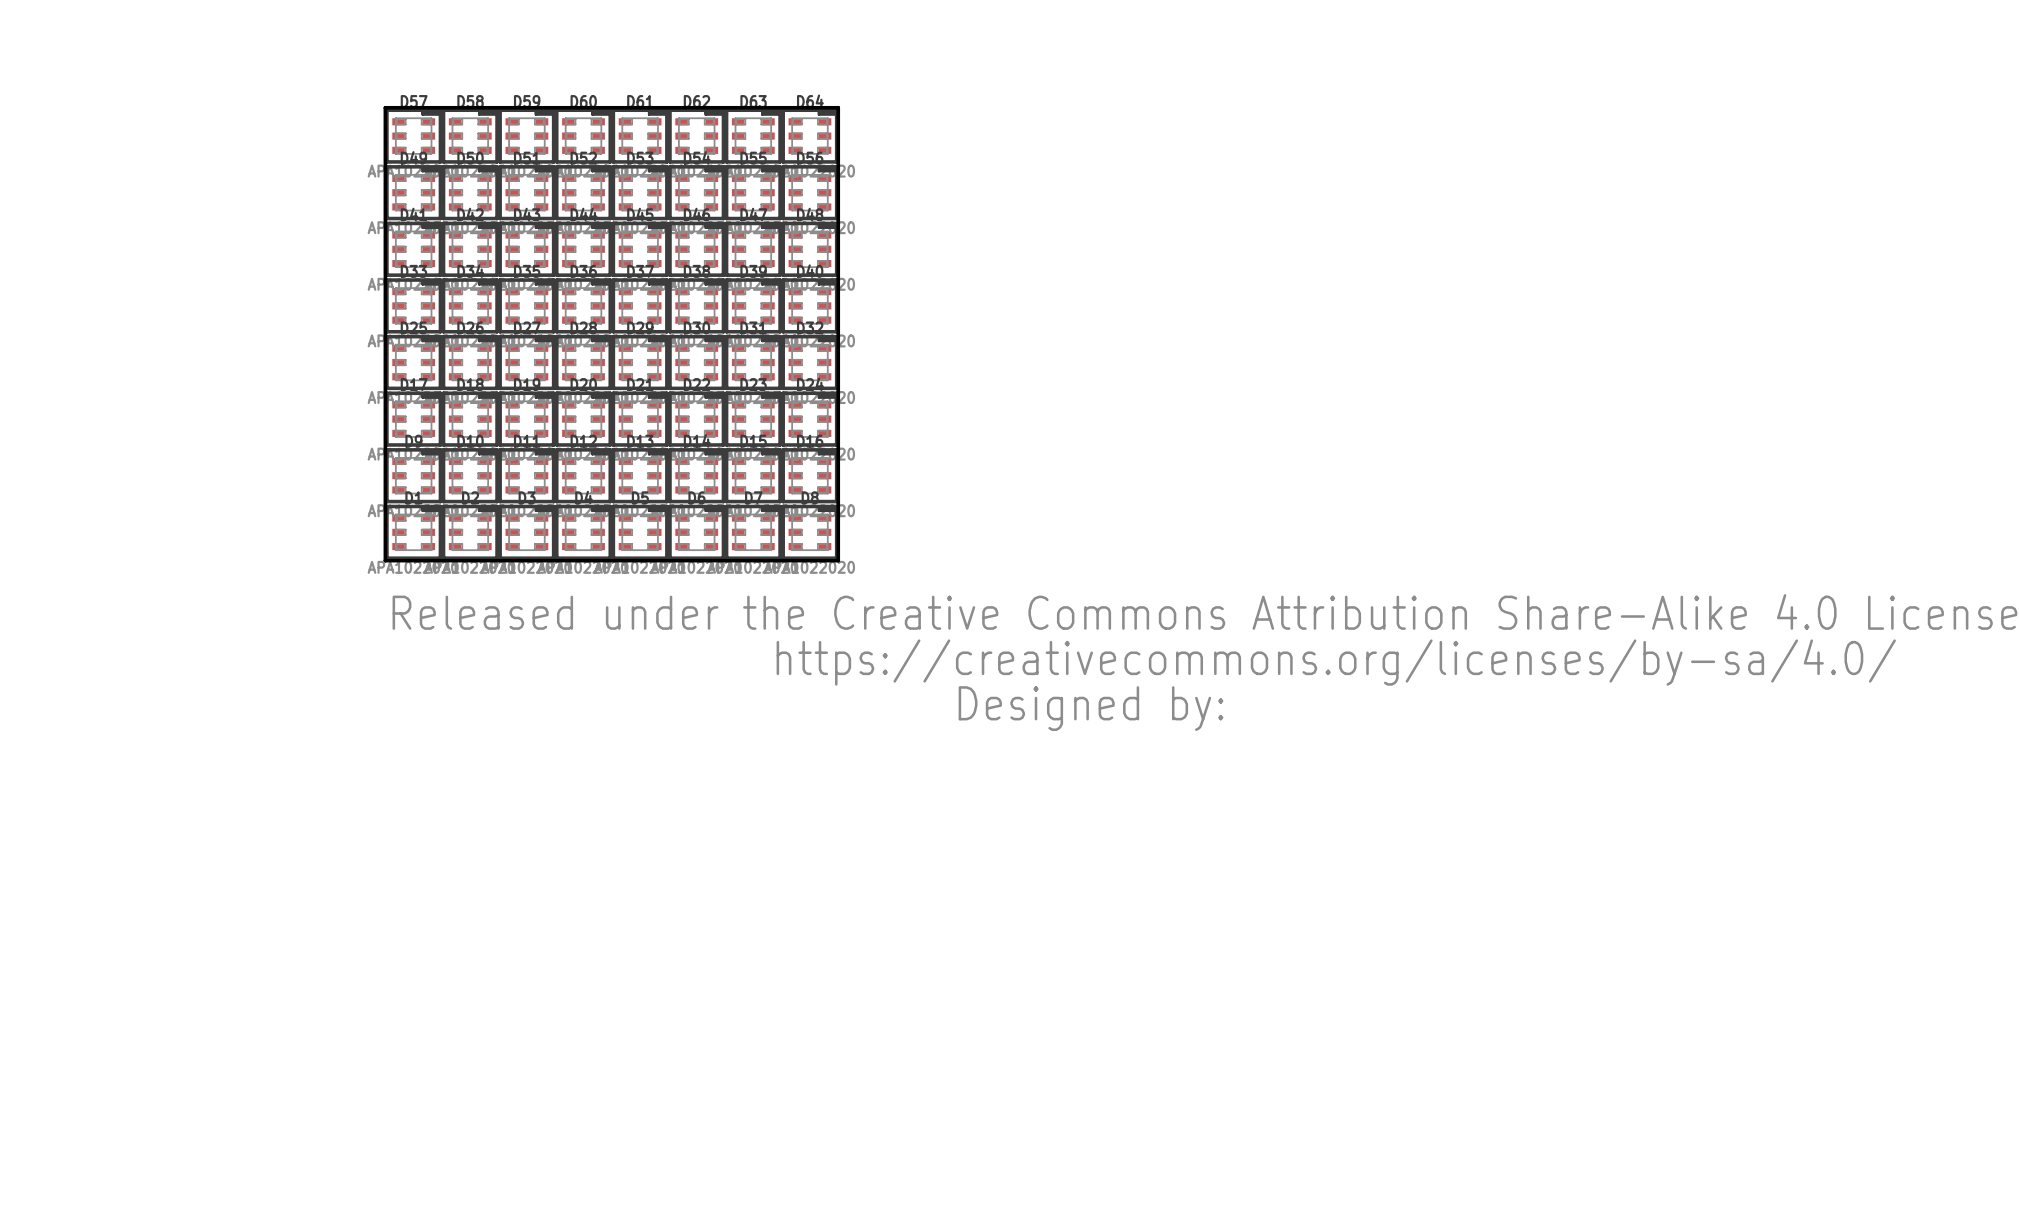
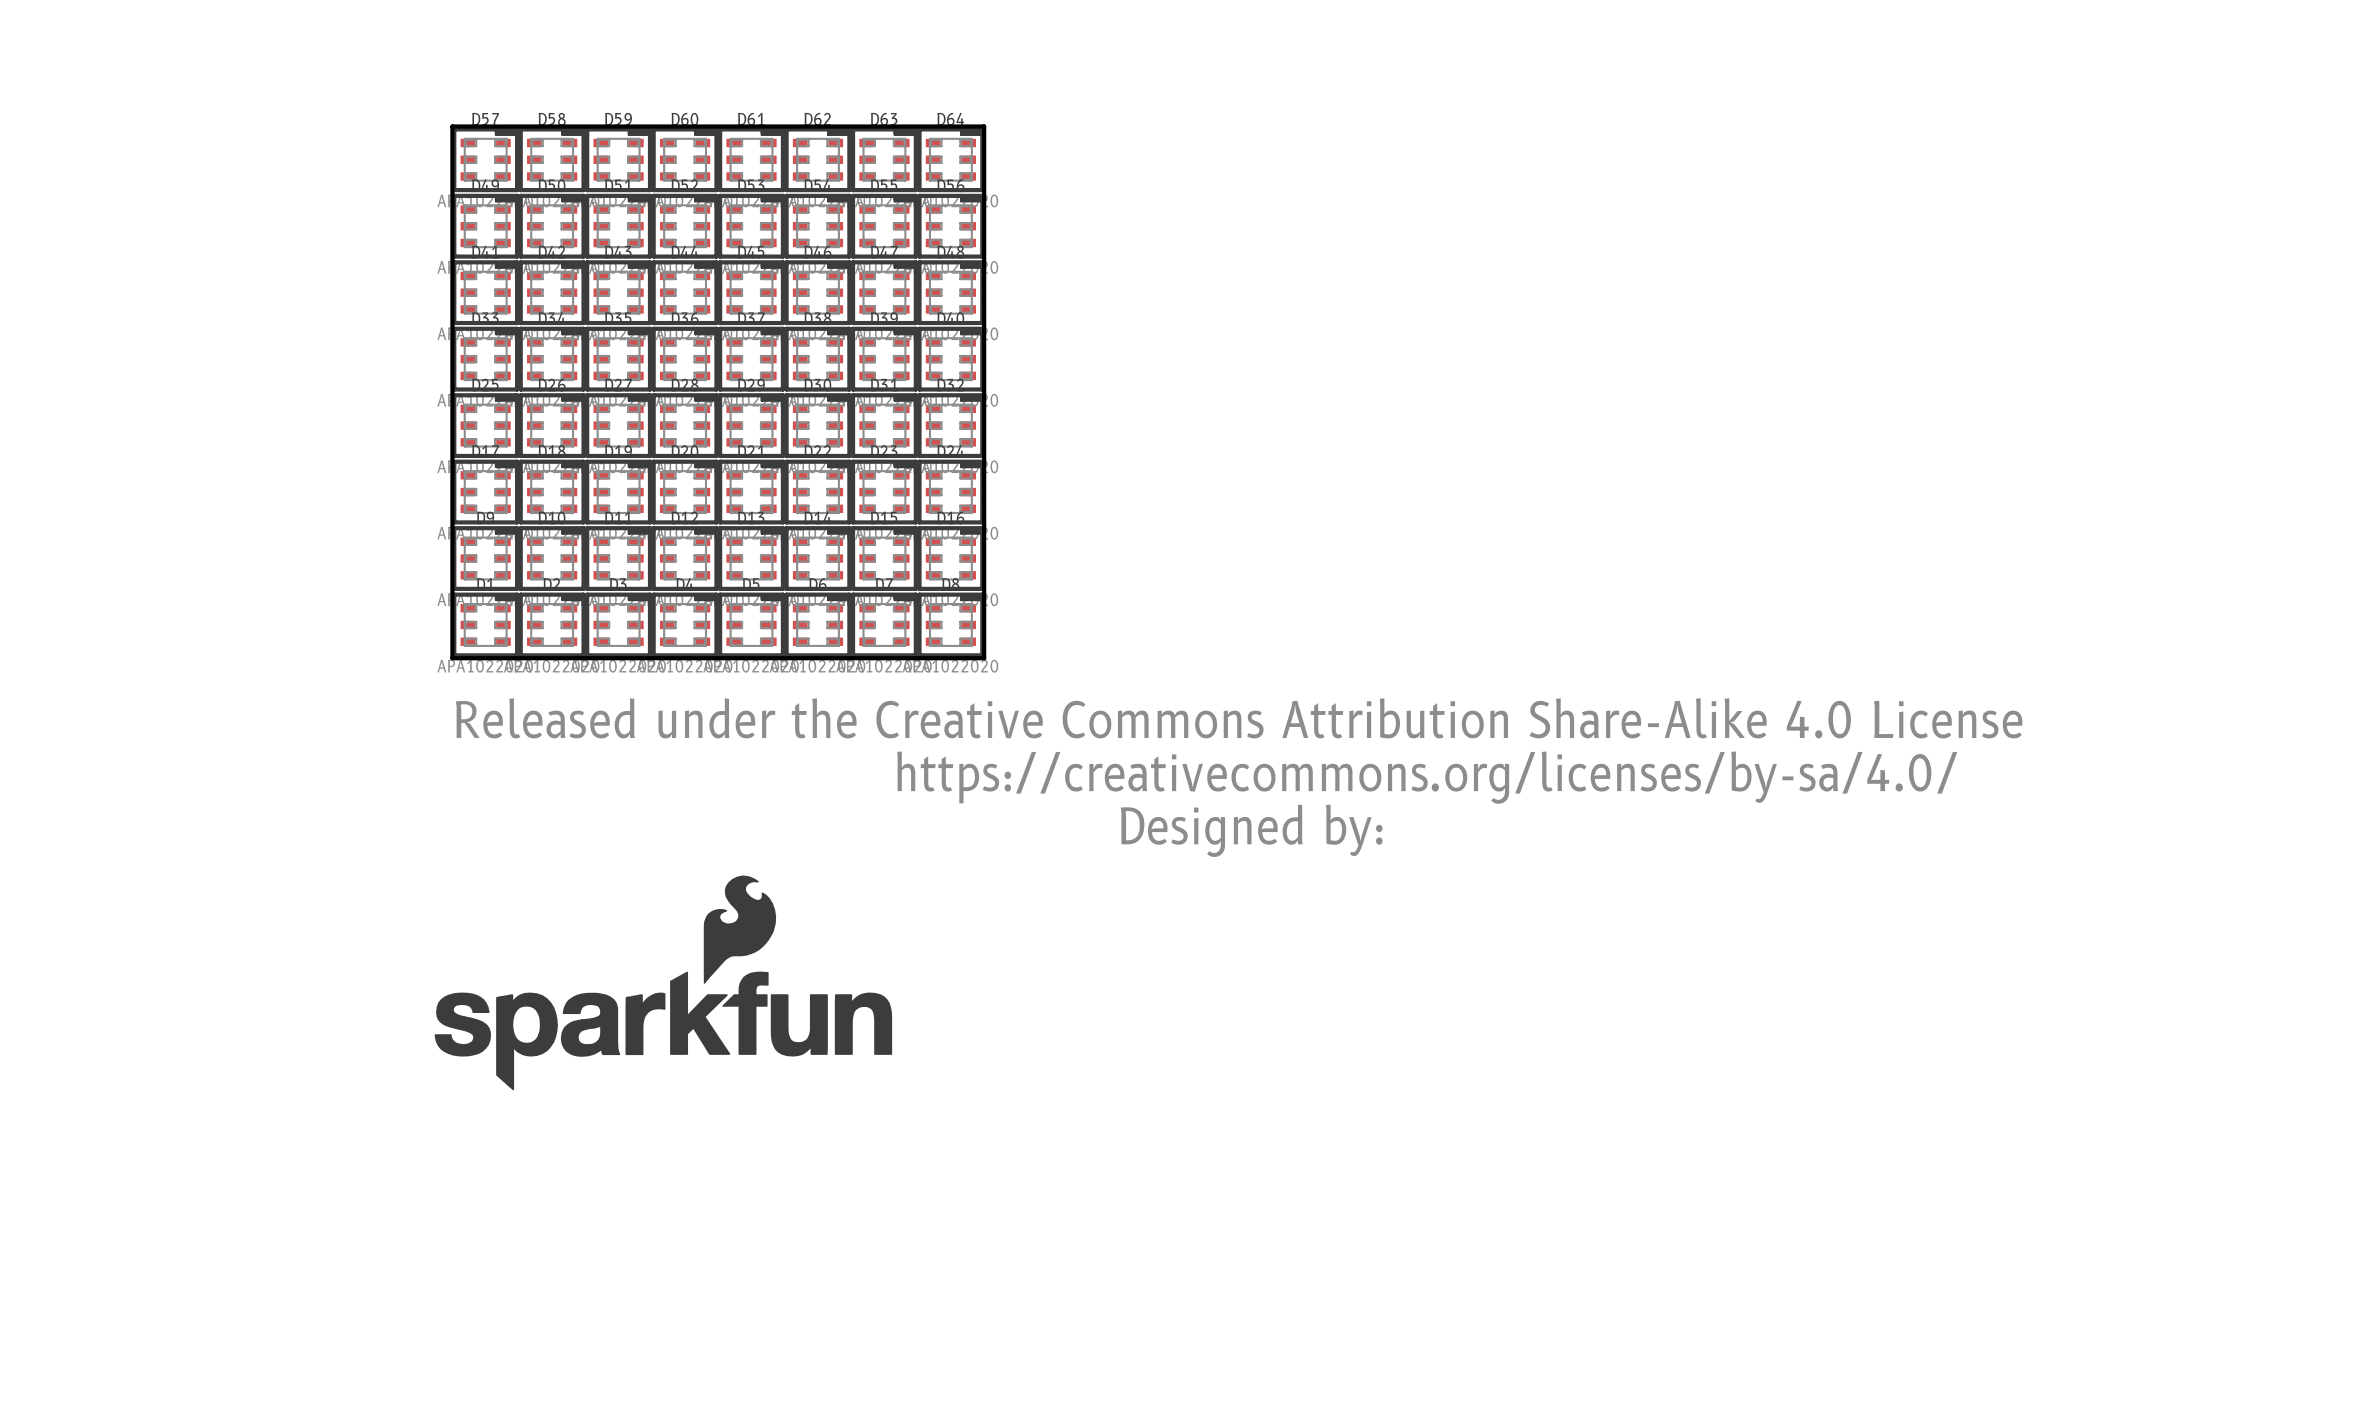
drawing: none -> [434, 875, 893, 1091]

